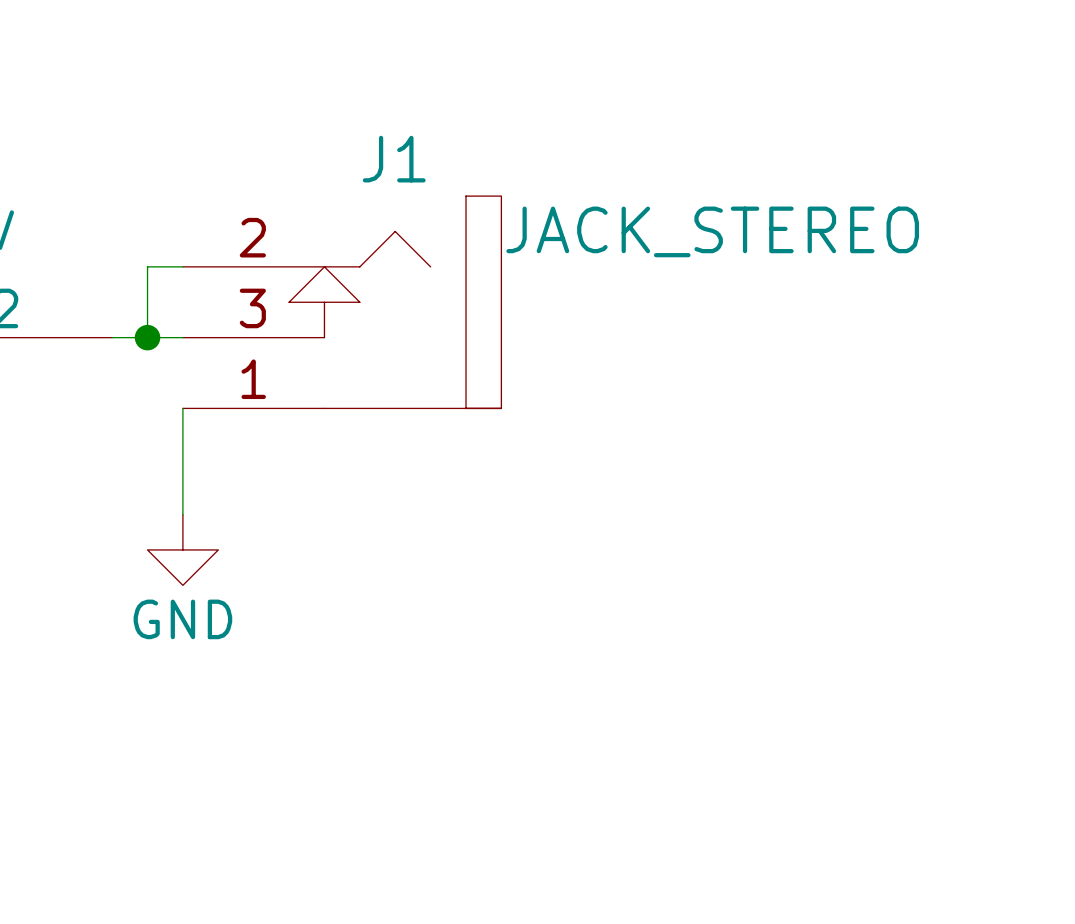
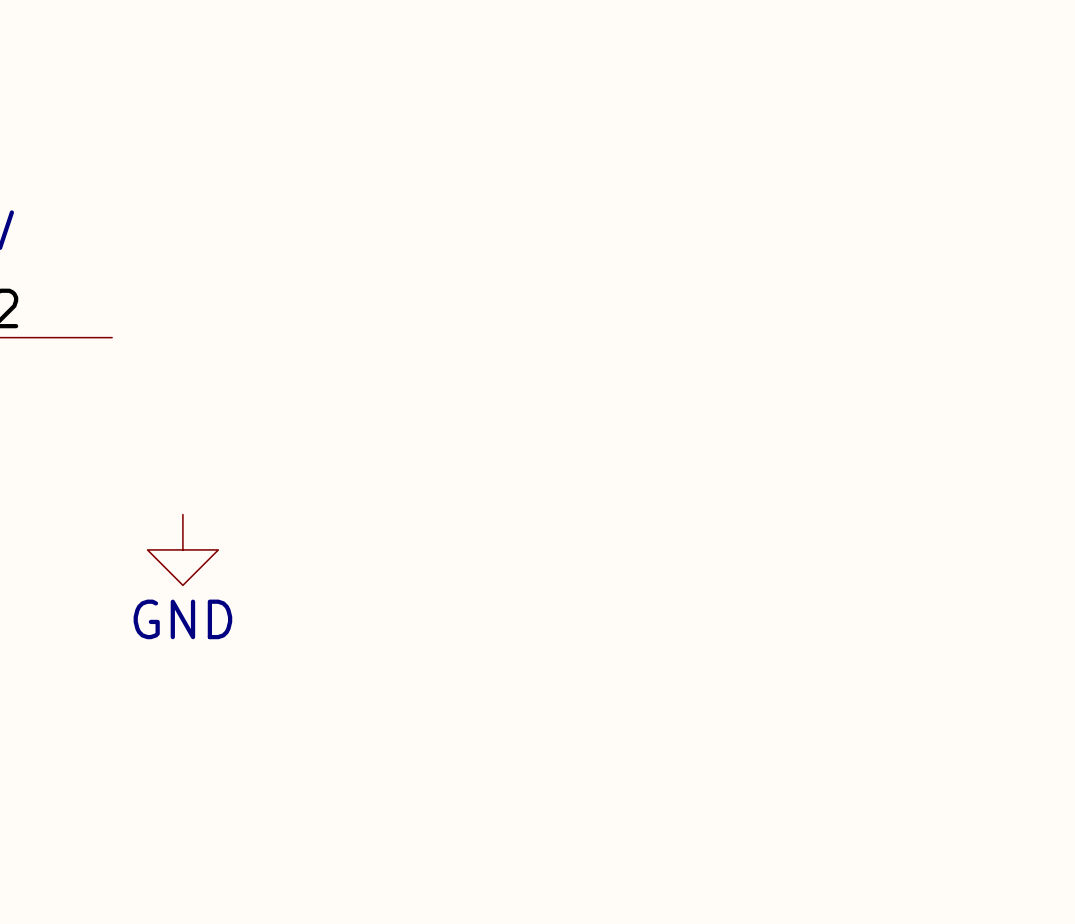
wire: (182, 266) (147, 266) (147, 337) -> none
J1: JACK_STEREO (342, 302) -> none
wire: (112, 337) (182, 337) -> none
junction: (147, 337) -> none
wire: (182, 408) (182, 514) -> none

